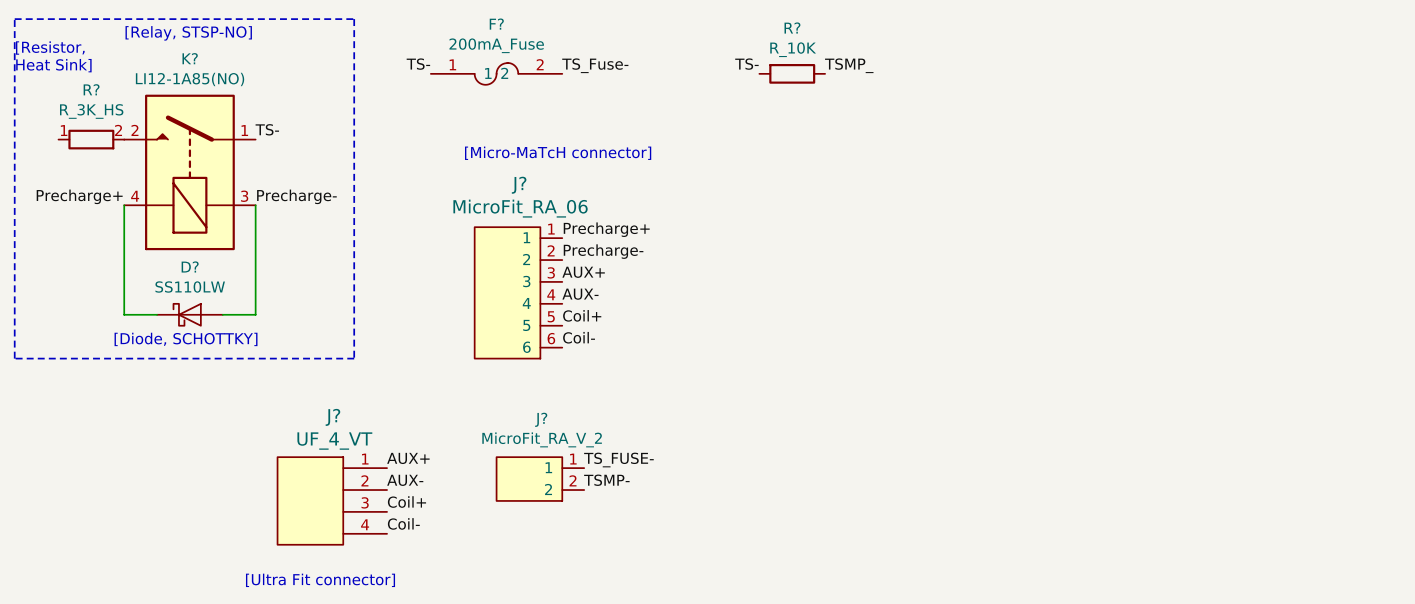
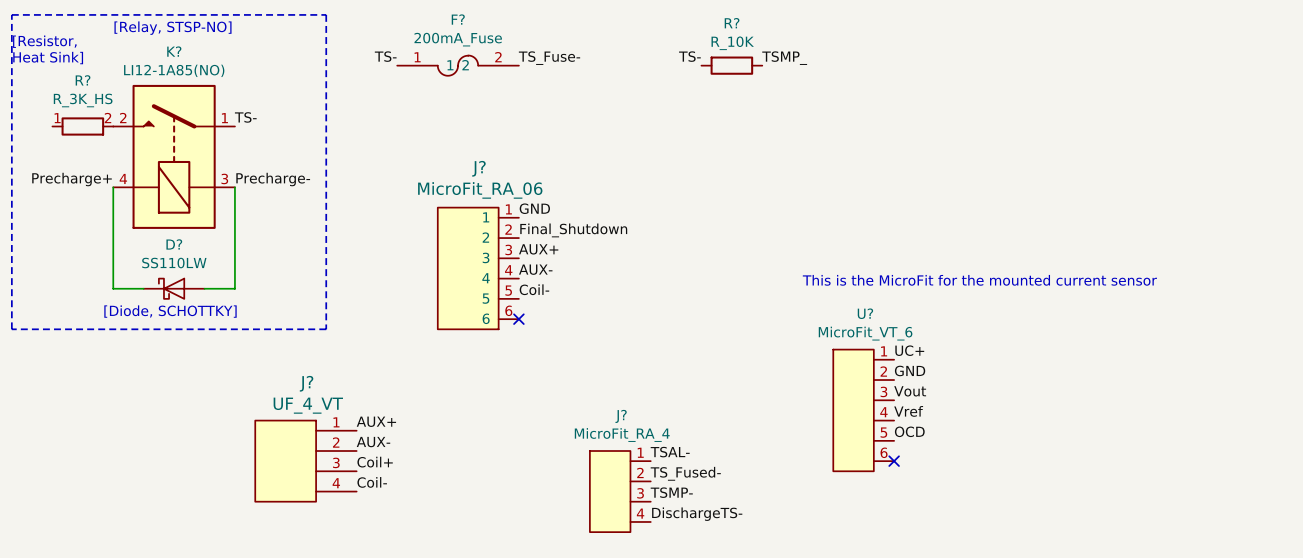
text: [Micro-MaTcH connector] (558, 153) -> none
label: Precharge+ (606, 229) -> GND (534, 208)
label: Precharge- (603, 251) -> Final_Shutdown (573, 230)
text: none -> This is the MicroFit for the mounted current sensor (979, 280)
label: Coil+ (582, 315) -> Coil- (534, 289)
label: Coil- (579, 337) -> none
no-connect mark: none -> (518, 319)
label: none -> UC+ (909, 350)
label: none -> GND (910, 370)
label: none -> Vout (910, 391)
U?: none -> MicroFit_VT_6 (863, 410)
label: none -> Vref (908, 411)
label: TS_FUSE- (618, 460) -> none
label: none -> OCD (909, 431)
J?: MicroFit_RA_V_2 (540, 479) -> none
label position: TSMP- (606, 480) -> TSMP- (671, 492)
label: none -> TSAL- (670, 452)
no-connect mark: none -> (894, 461)
label: none -> TS_Fused- (685, 473)
J?: none -> MicroFit_RA_4 (620, 491)
label: none -> DischargeTS- (697, 514)
text: [Ultra Fit connector] (320, 580) -> none

